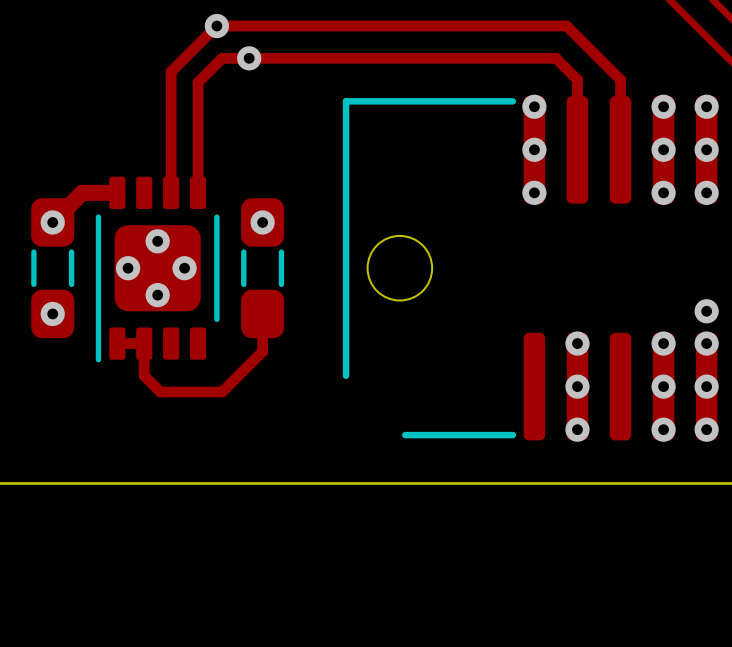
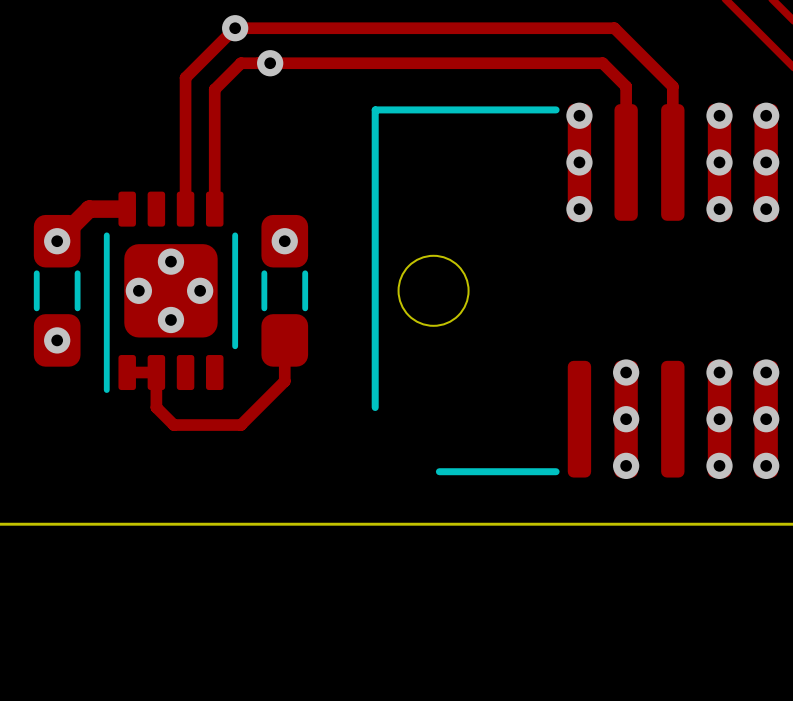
via: (706, 311) -> none

